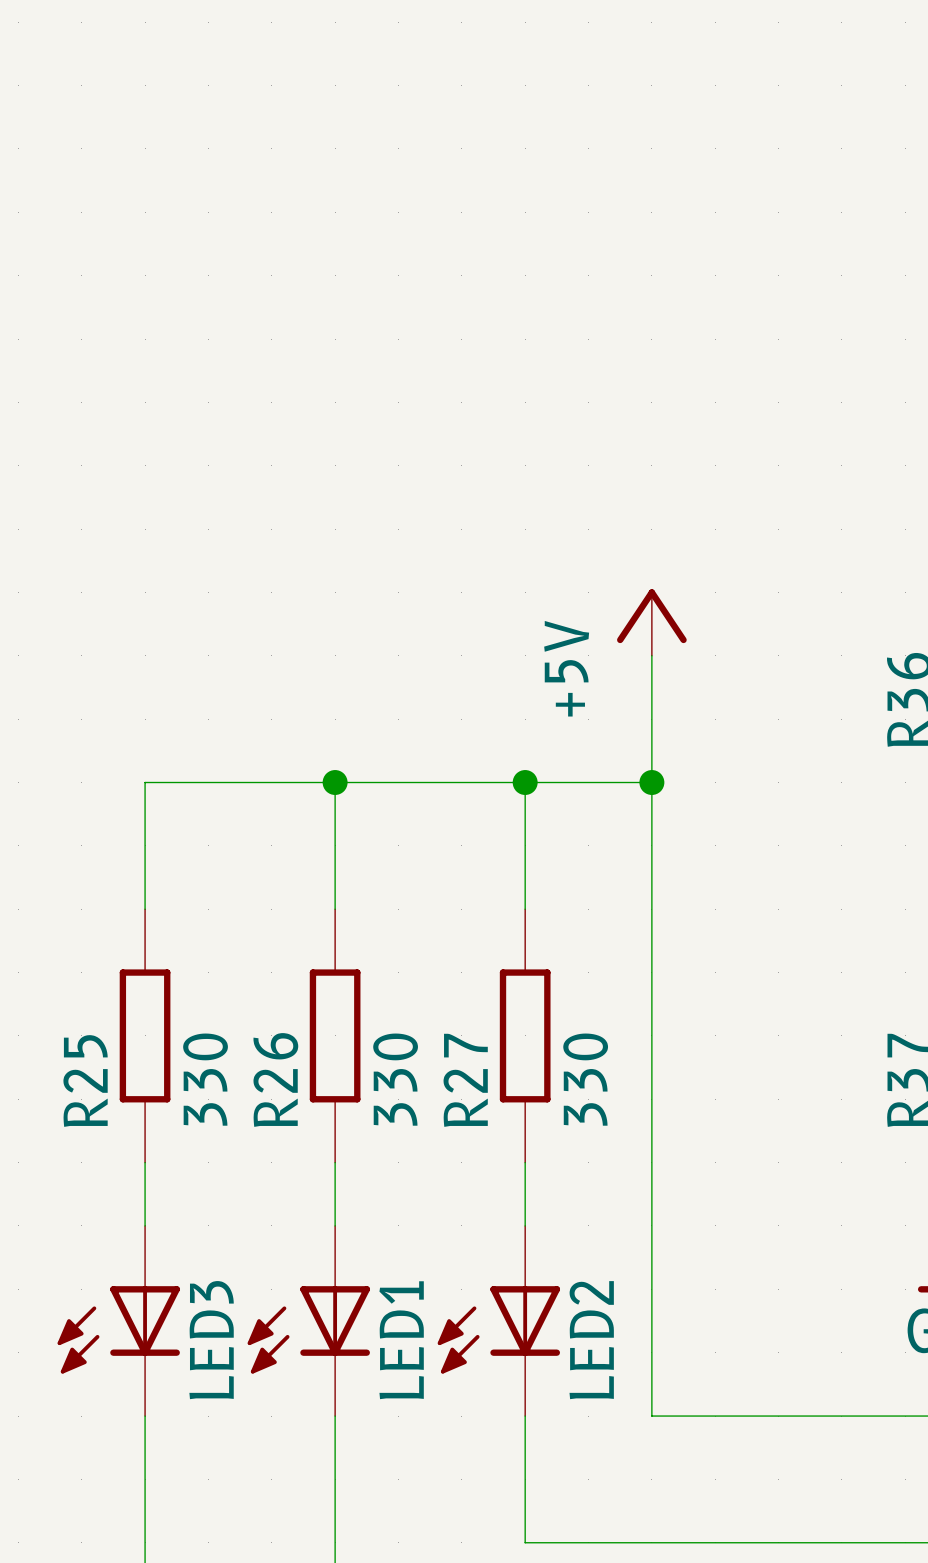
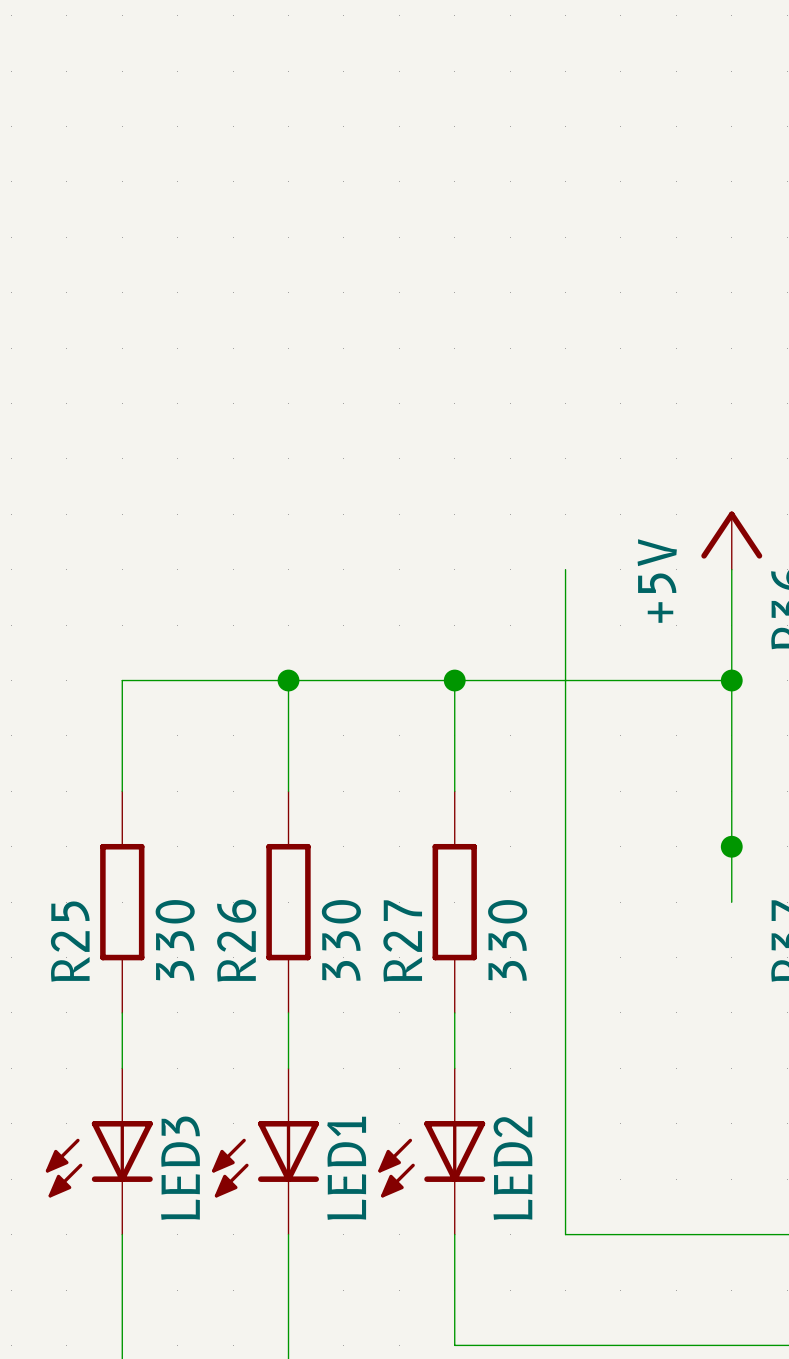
power symbol position: +5V (651, 622) -> +5V (731, 540)
wire: none -> (731, 569) (731, 902)
wire: none -> (565, 680) (731, 680)
junction: (651, 782) -> none
junction: none -> (731, 680)
junction: none -> (731, 846)

